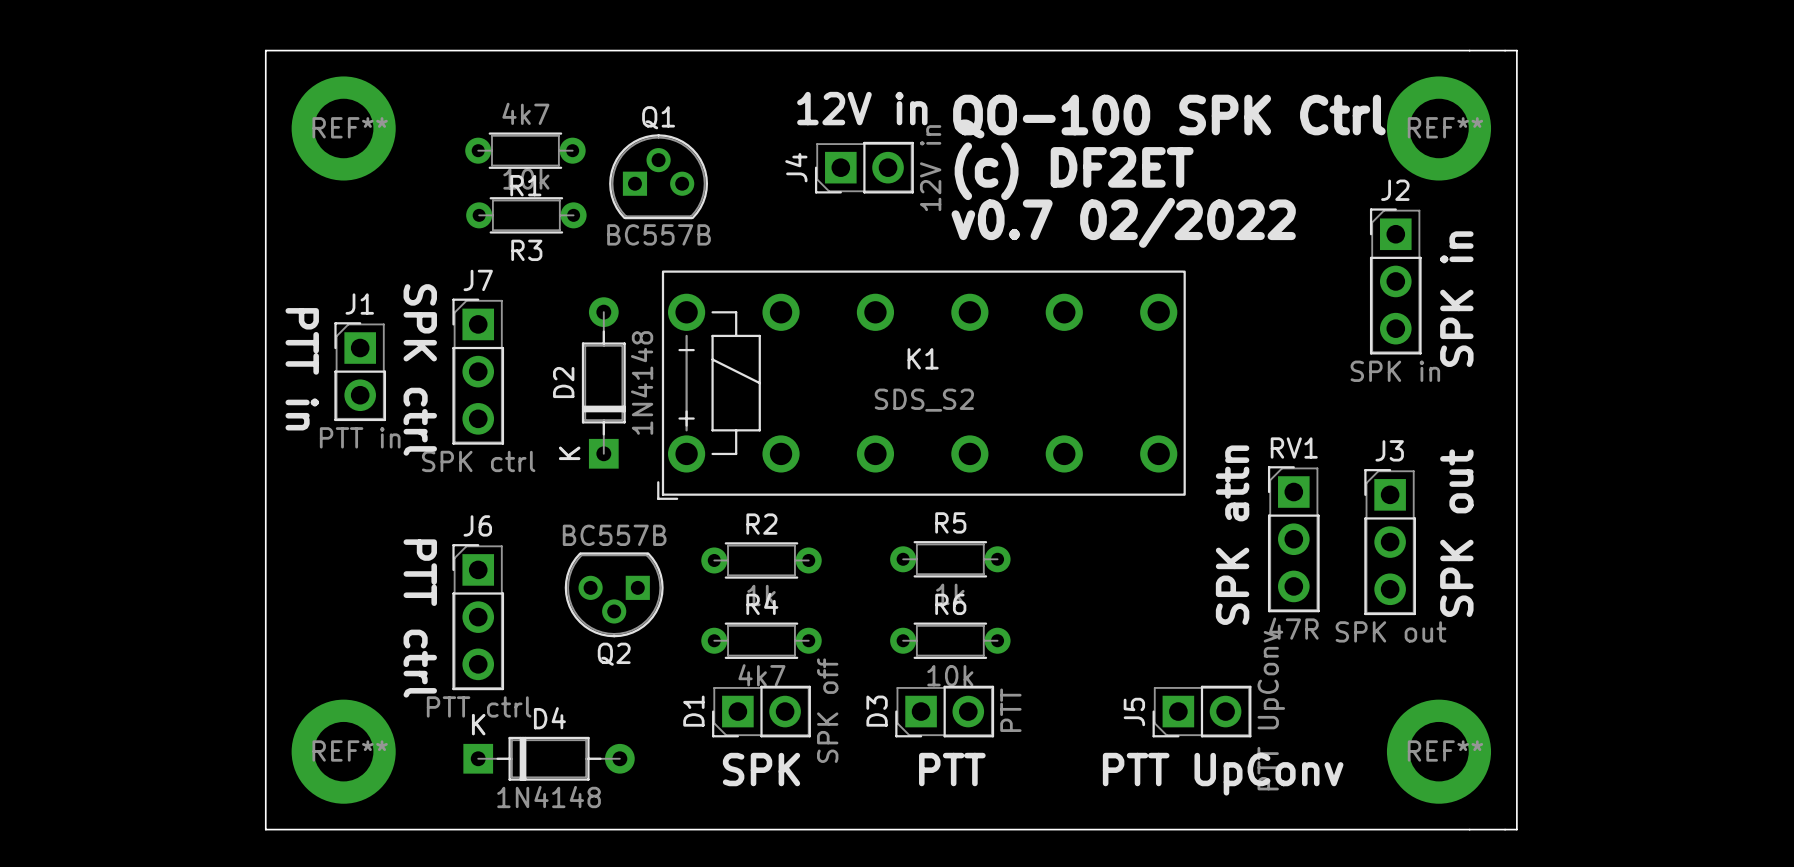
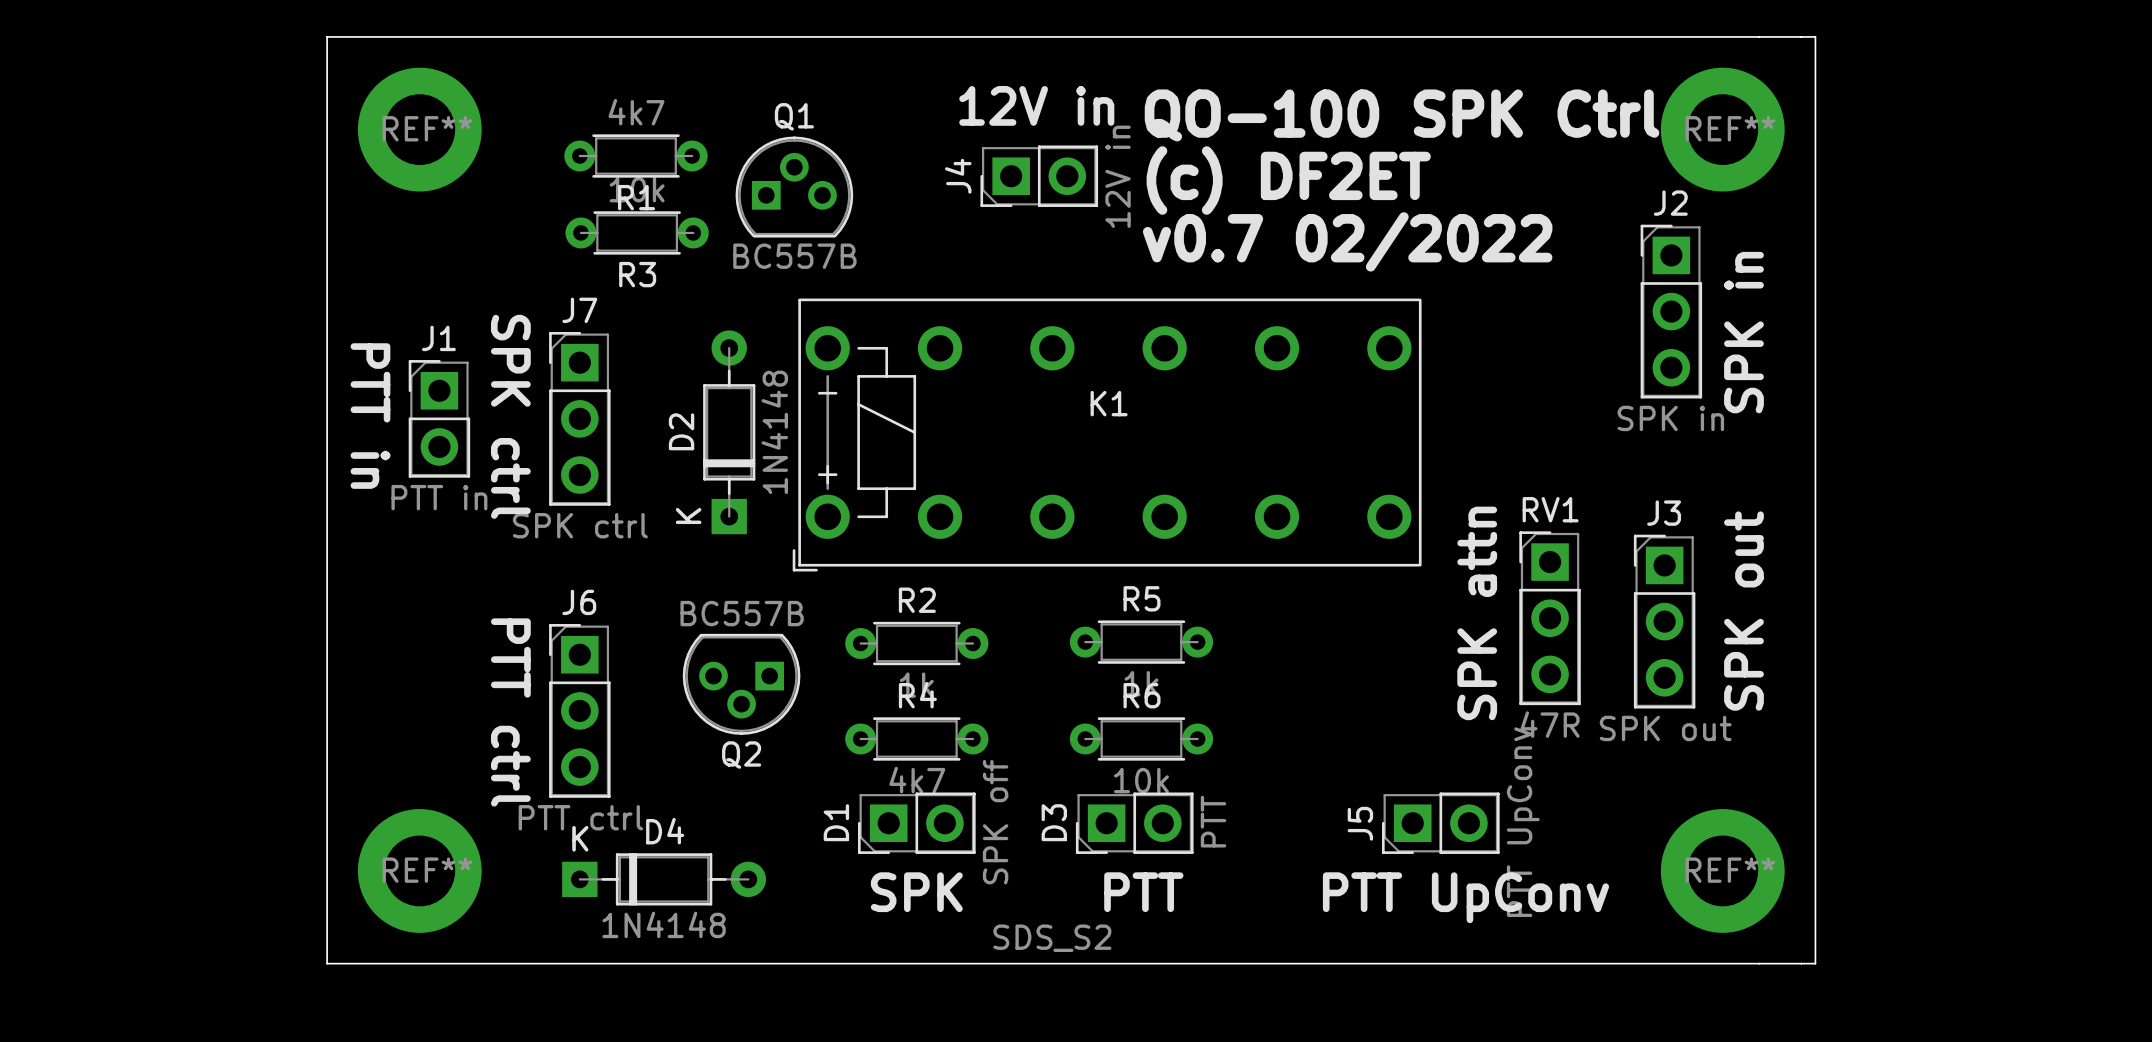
K1 value position: SDS_S2 (924, 400) -> SDS_S2 (1052, 938)

